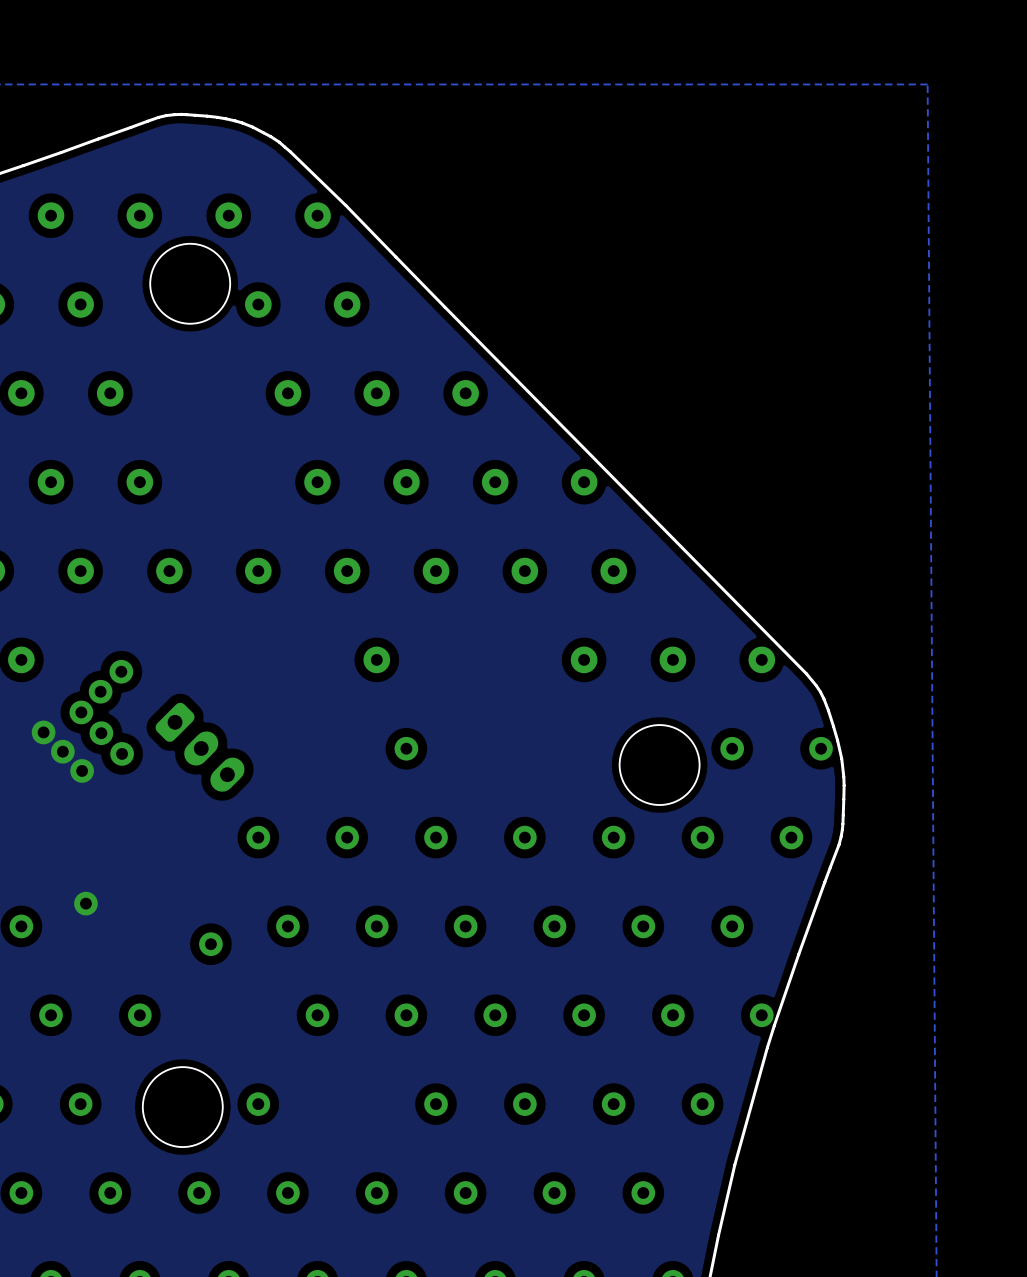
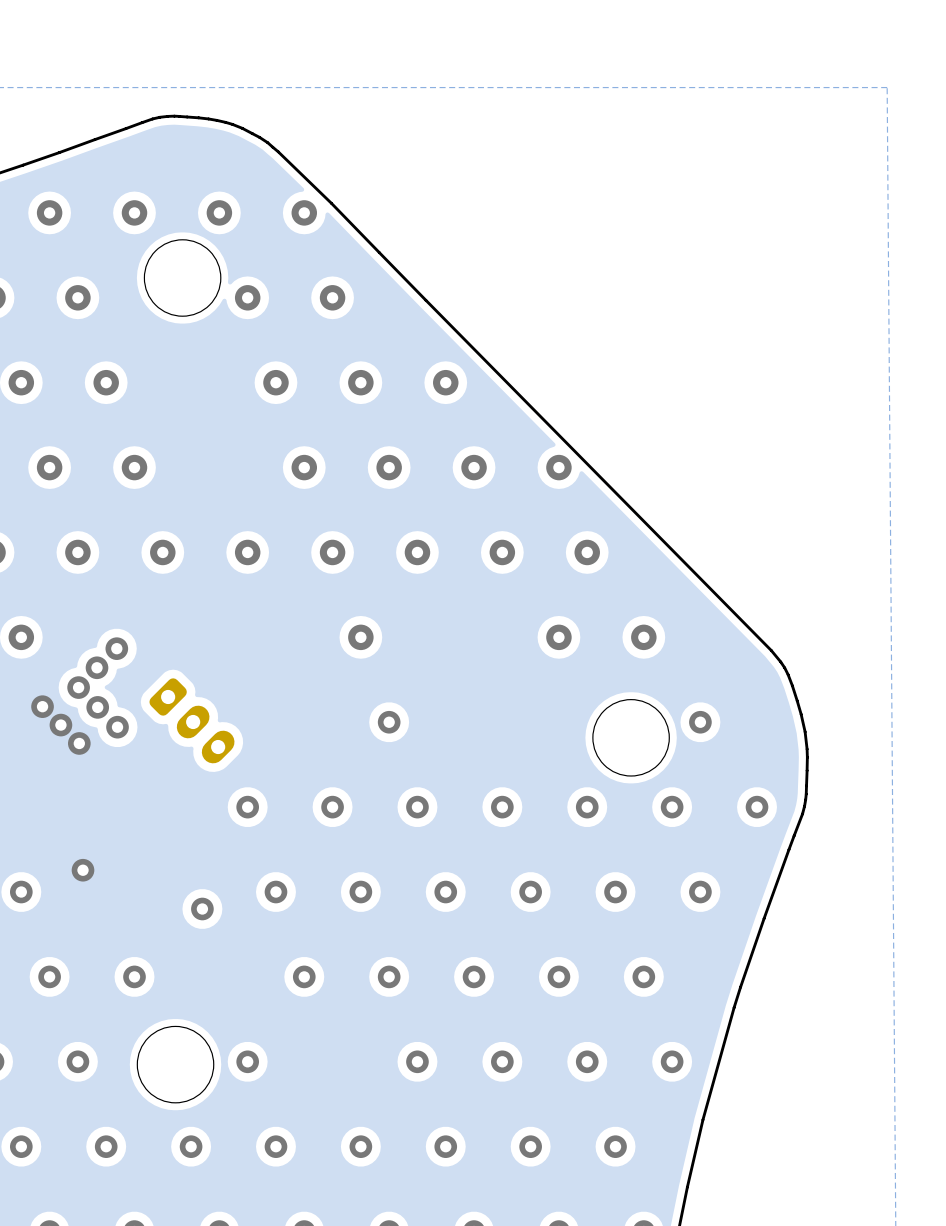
via: (761, 659) -> none
via: (821, 748) -> none
via: (761, 1015) -> none

